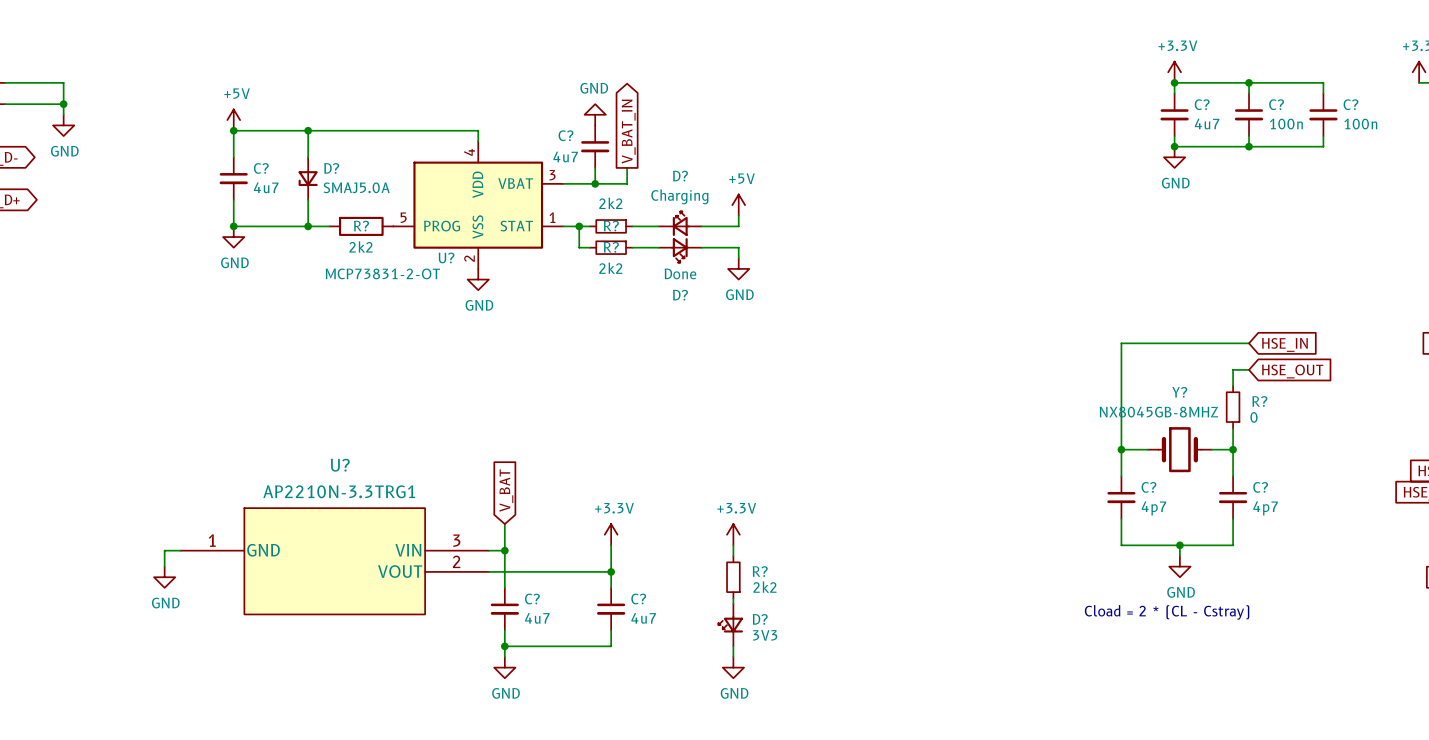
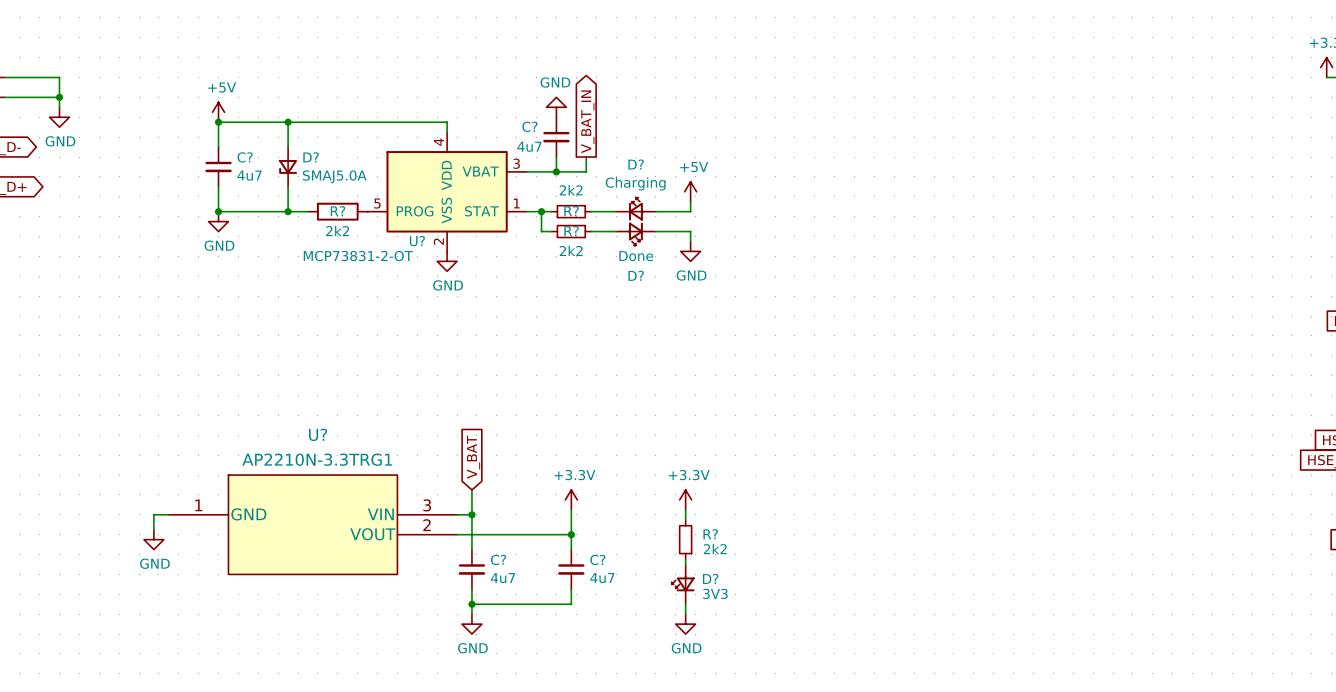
power symbol: +3.3V (1174, 72) -> none
junction: (1174, 82) -> none
wire: (1249, 82) (1249, 93) -> none
junction: (1249, 82) -> none
wire: (1174, 93) (1174, 82) (1323, 82) (1323, 93) -> none
C?: 4u7 (1174, 114) -> none
C?: 100n (1249, 114) -> none
C?: 100n (1323, 114) -> none
wire: (1174, 136) (1174, 146) (1323, 146) (1323, 136) -> none
wire: (1249, 136) (1249, 146) -> none
junction: (1174, 146) -> none
junction: (1249, 146) -> none
power symbol: GND (1174, 157) -> none
wire: (1249, 343) (1121, 343) (1121, 476) -> none
global label: HSE_IN (1284, 344) -> none
wire: (1249, 369) (1233, 369) (1233, 385) -> none
global label: HSE_OUT (1292, 371) -> none
R?: 0 (1233, 407) -> none
wire: (1233, 428) (1233, 476) -> none
wire: (1121, 449) (1148, 449) -> none
junction: (1121, 449) -> none
Y?: NX8045GB-8MHZ (1179, 449) -> none
wire: (1211, 449) (1233, 449) -> none
junction: (1233, 449) -> none
C?: 4p7 (1121, 497) -> none
C?: 4p7 (1233, 497) -> none
wire: (1121, 518) (1121, 545) (1233, 545) (1233, 518) -> none
wire: (1179, 545) (1179, 555) -> none
junction: (1179, 545) -> none
power symbol: GND (1179, 566) -> none
text: Cload = 2 * (CL - Cstray) (1167, 612) -> none

